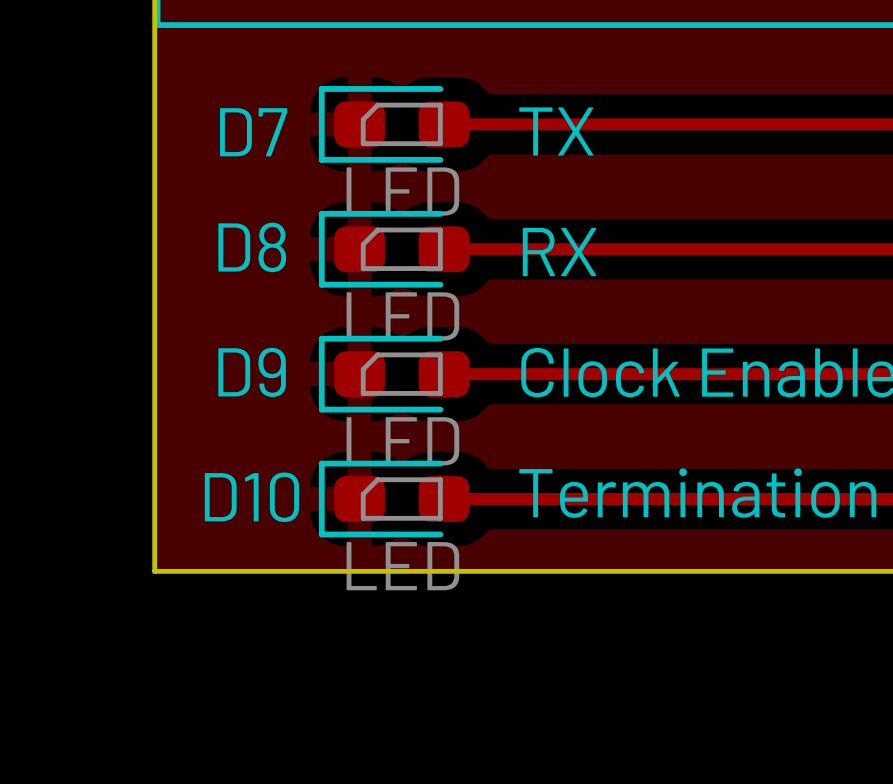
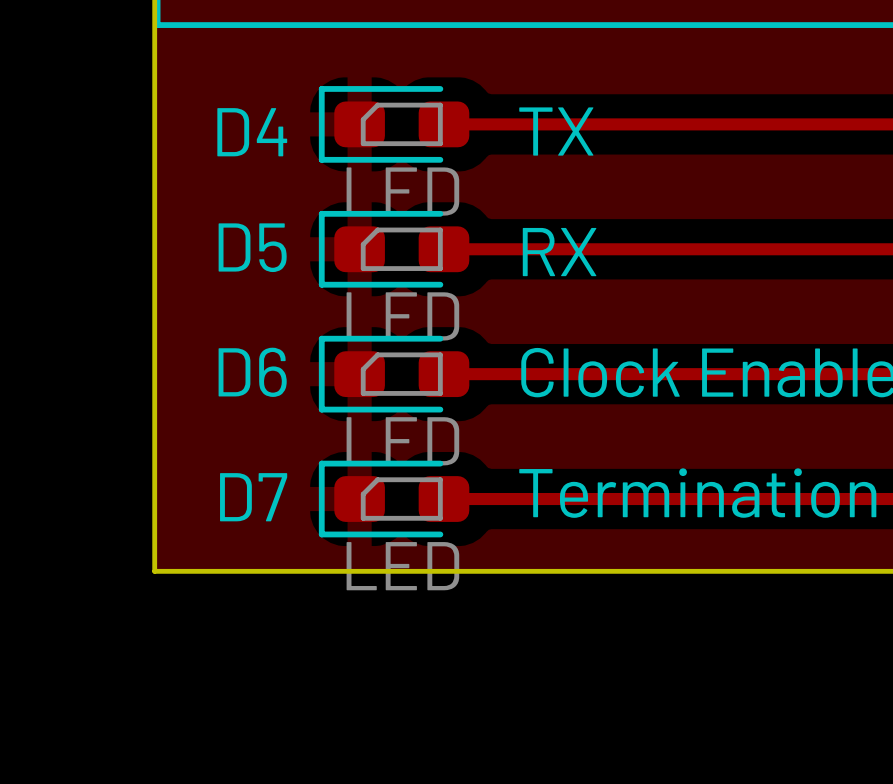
D7 name: D7 (253, 132) -> D4 (252, 132)
D8 name: D8 (252, 247) -> D5 (252, 247)
D9 name: D9 (252, 372) -> D6 (252, 372)
D10 name: D10 (251, 497) -> D7 (253, 497)

